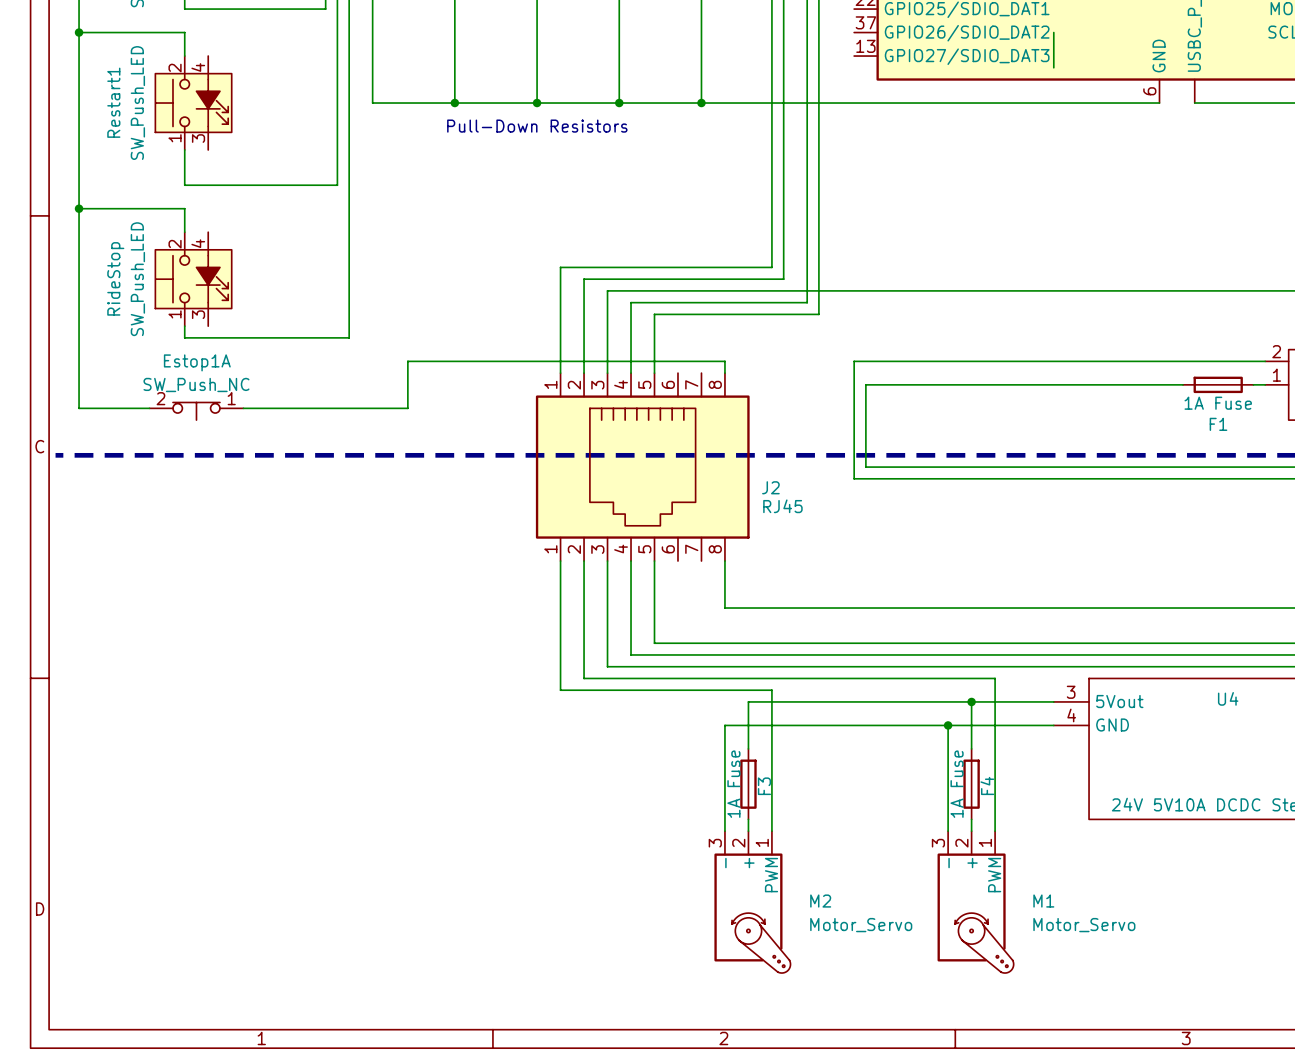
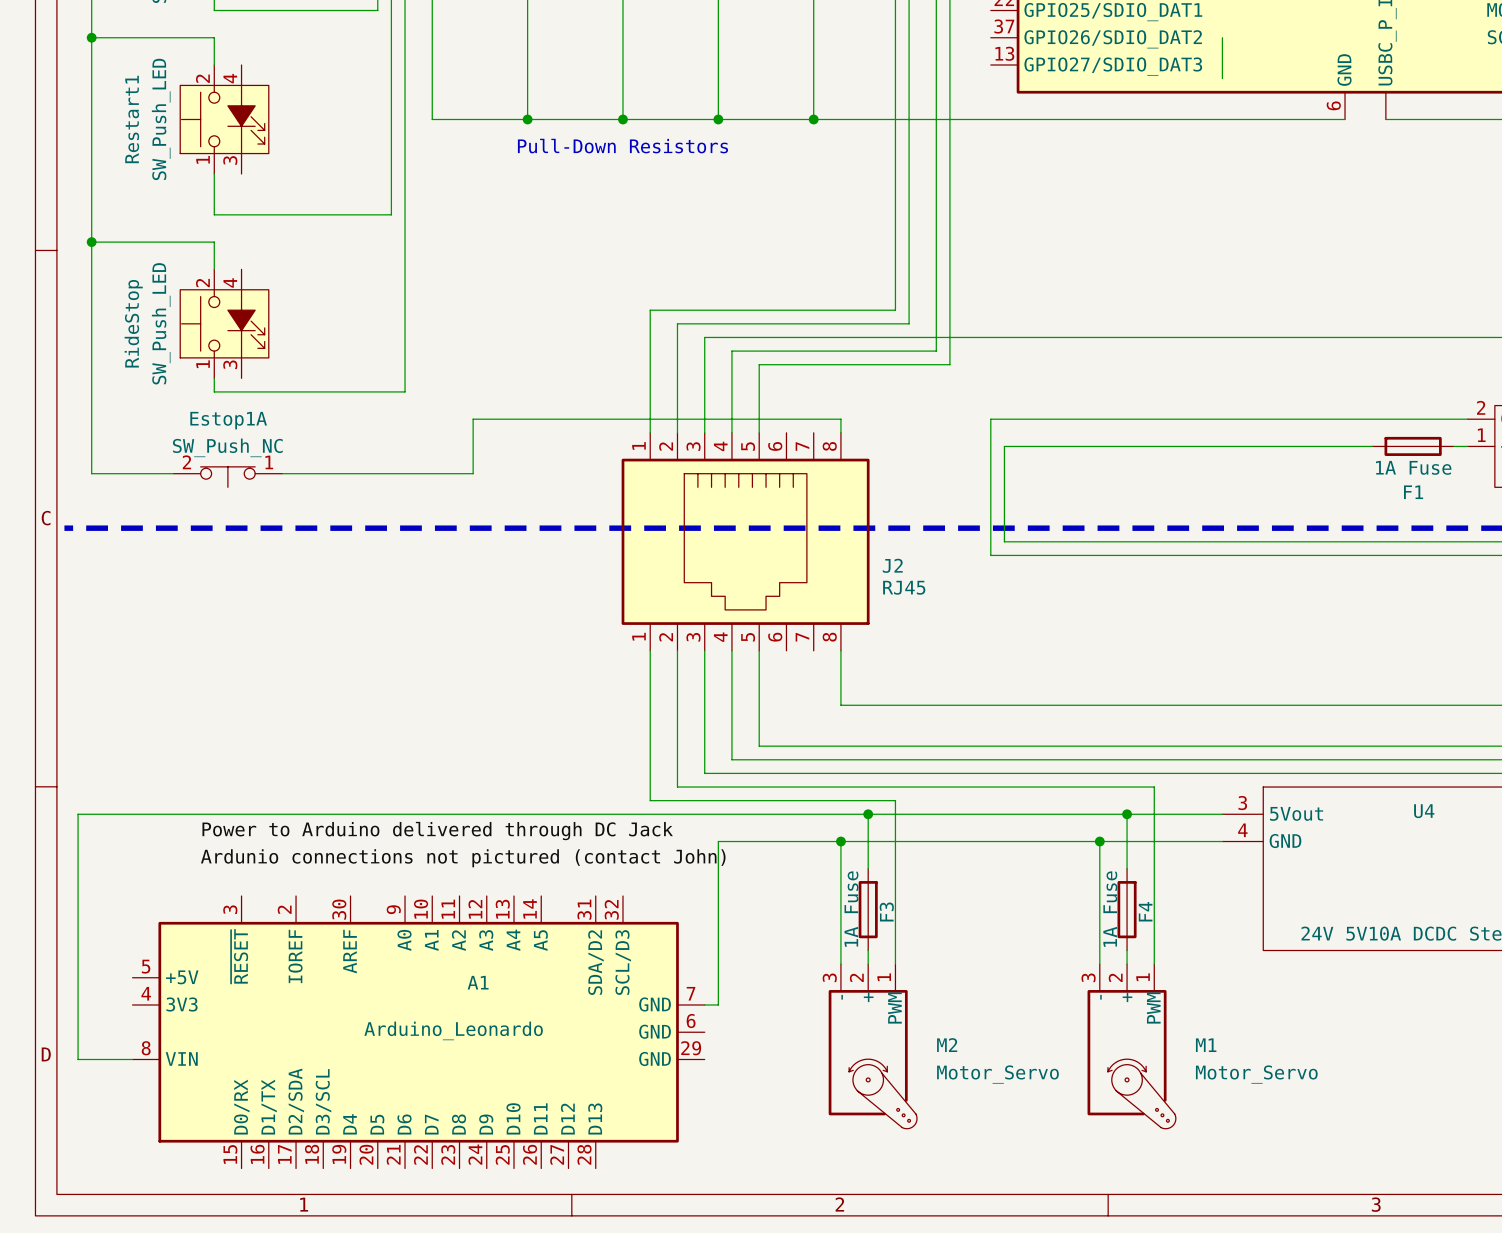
wire: none -> (868, 814) (78, 814) (78, 1059) (132, 1059)
junction: none -> (868, 814)
label: none -> Power to Arduino delivered through DC Jack (437, 831)
wire: none -> (840, 841) (718, 841) (718, 1004) (704, 1004)
junction: none -> (840, 841)
label: none -> Ardunio connections not pictured (contact John) (463, 858)
A1: none -> Arduino_Leonardo (418, 1032)

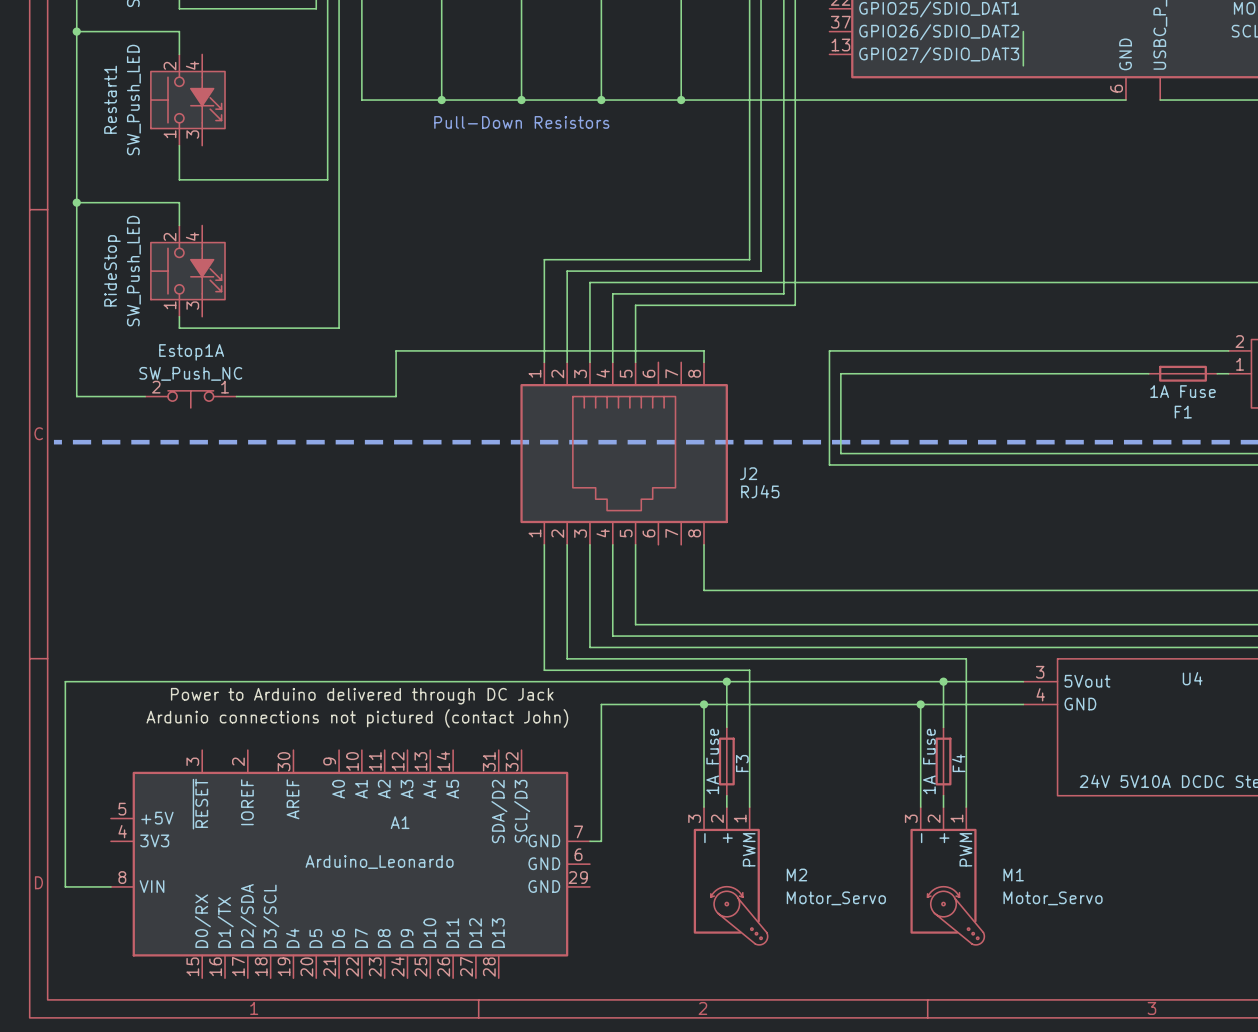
label position: Ardunio connections not pictured (contact John) (463, 858) -> Ardunio connections not pictured (contact John) (357, 718)

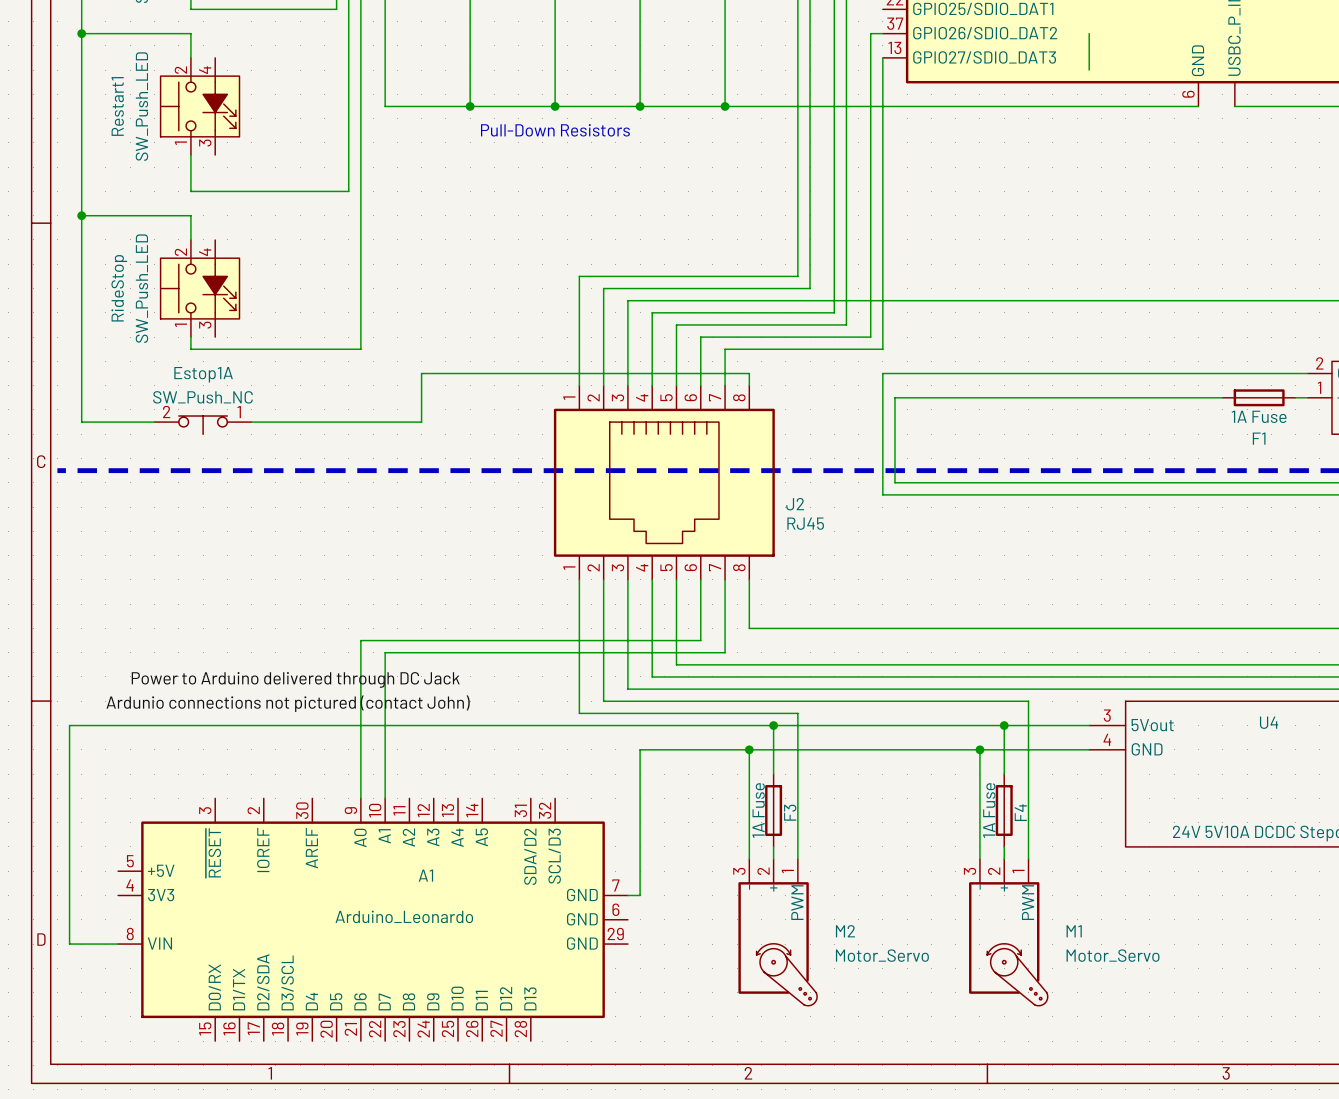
wire: none -> (882, 33) (870, 33) (870, 337) (700, 337) (700, 385)
wire: none -> (882, 57) (882, 349) (725, 349) (725, 385)
wire: none -> (700, 579) (700, 640) (360, 640) (360, 798)
wire: none -> (725, 579) (725, 652) (385, 652) (385, 798)
label position: Power to Arduino delivered through DC Jack (362, 696) -> Power to Arduino delivered through DC Jack (295, 679)
label position: Ardunio connections not pictured (contact John) (357, 718) -> Ardunio connections not pictured (contact John) (288, 703)

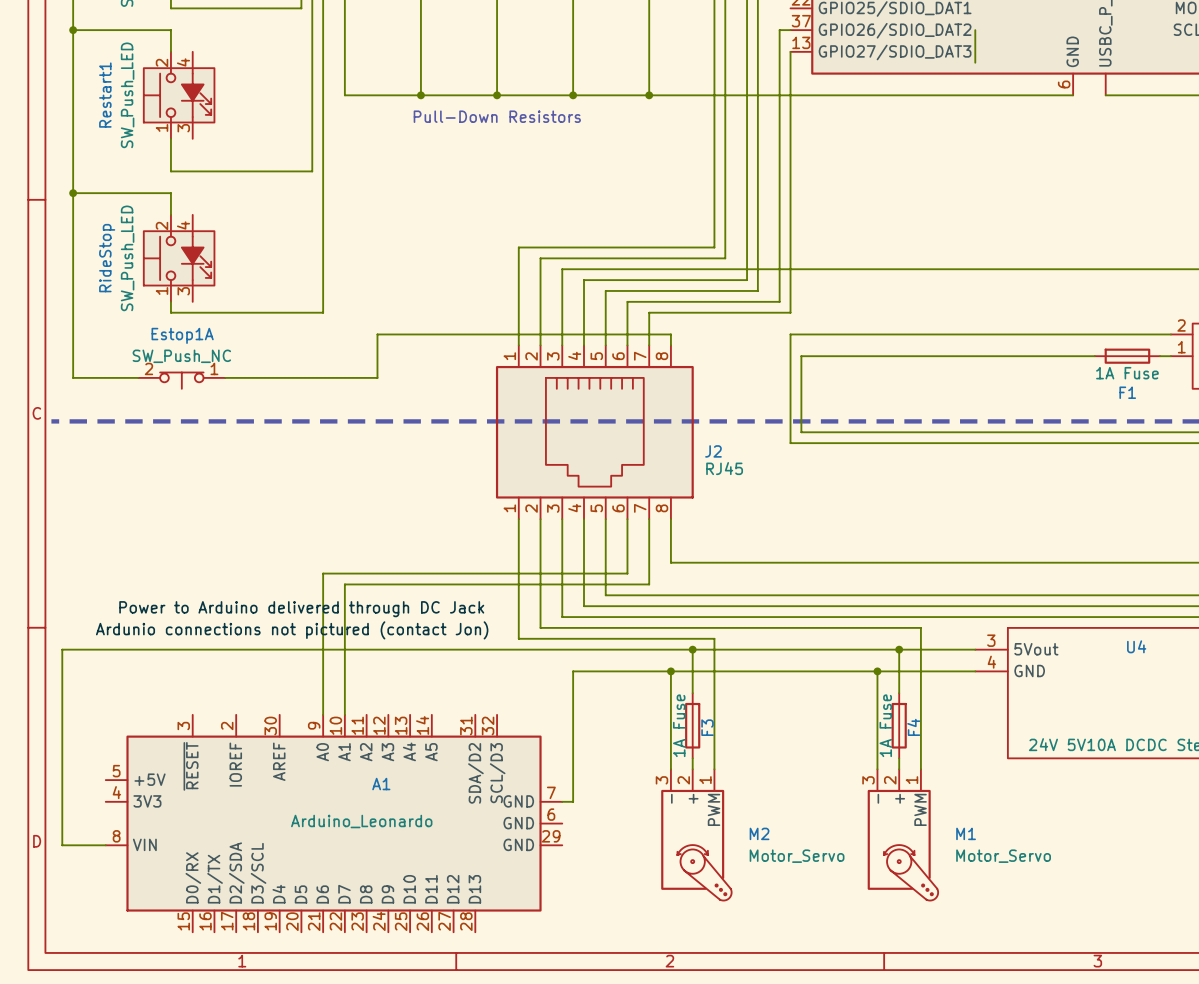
label: Ardunio connections not pictured (contact John) (288, 703) -> Ardunio connections not pictured (contact Jon) (292, 630)

